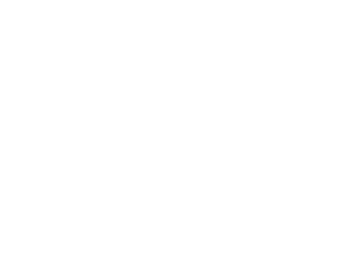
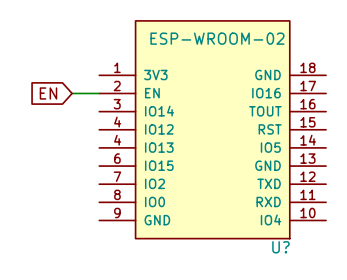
global label: none -> EN (48, 93)
wire: none -> (72, 93) (99, 93)
U?: none -> ESP-WROOM-02 (212, 129)

